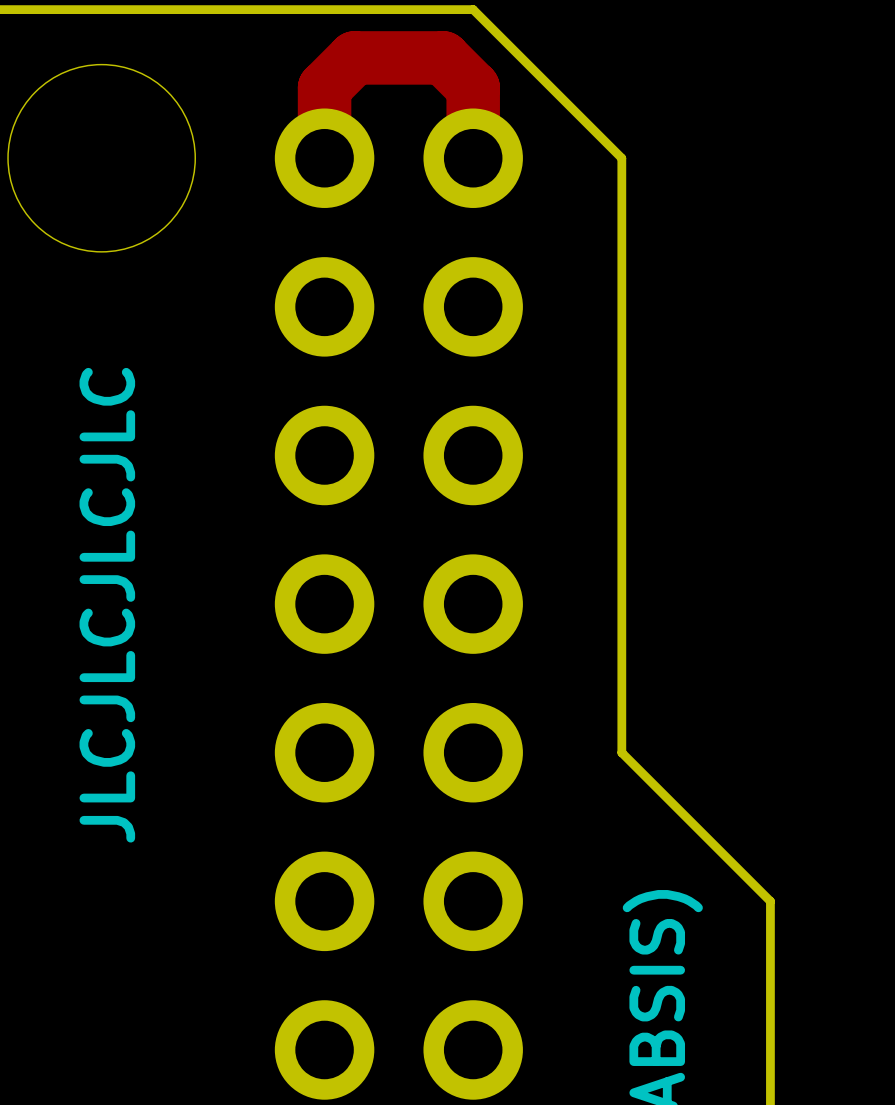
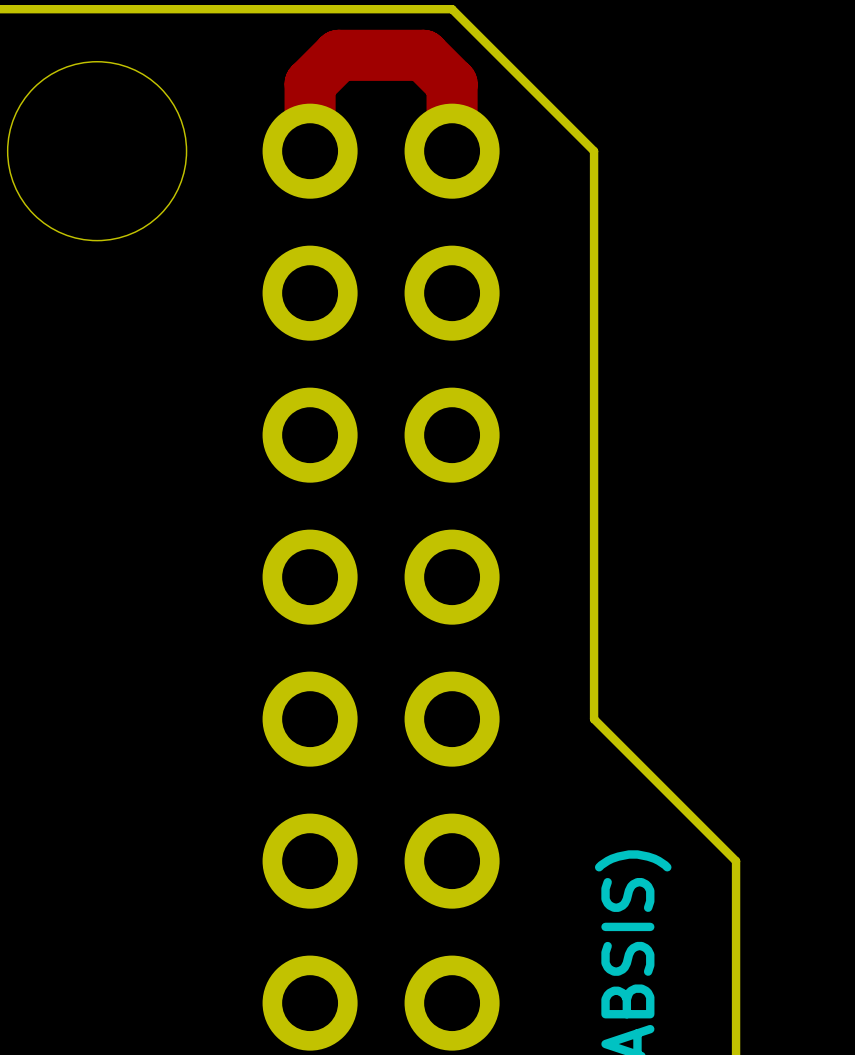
text: JLCJLCJLCJLC (107, 605) -> none

